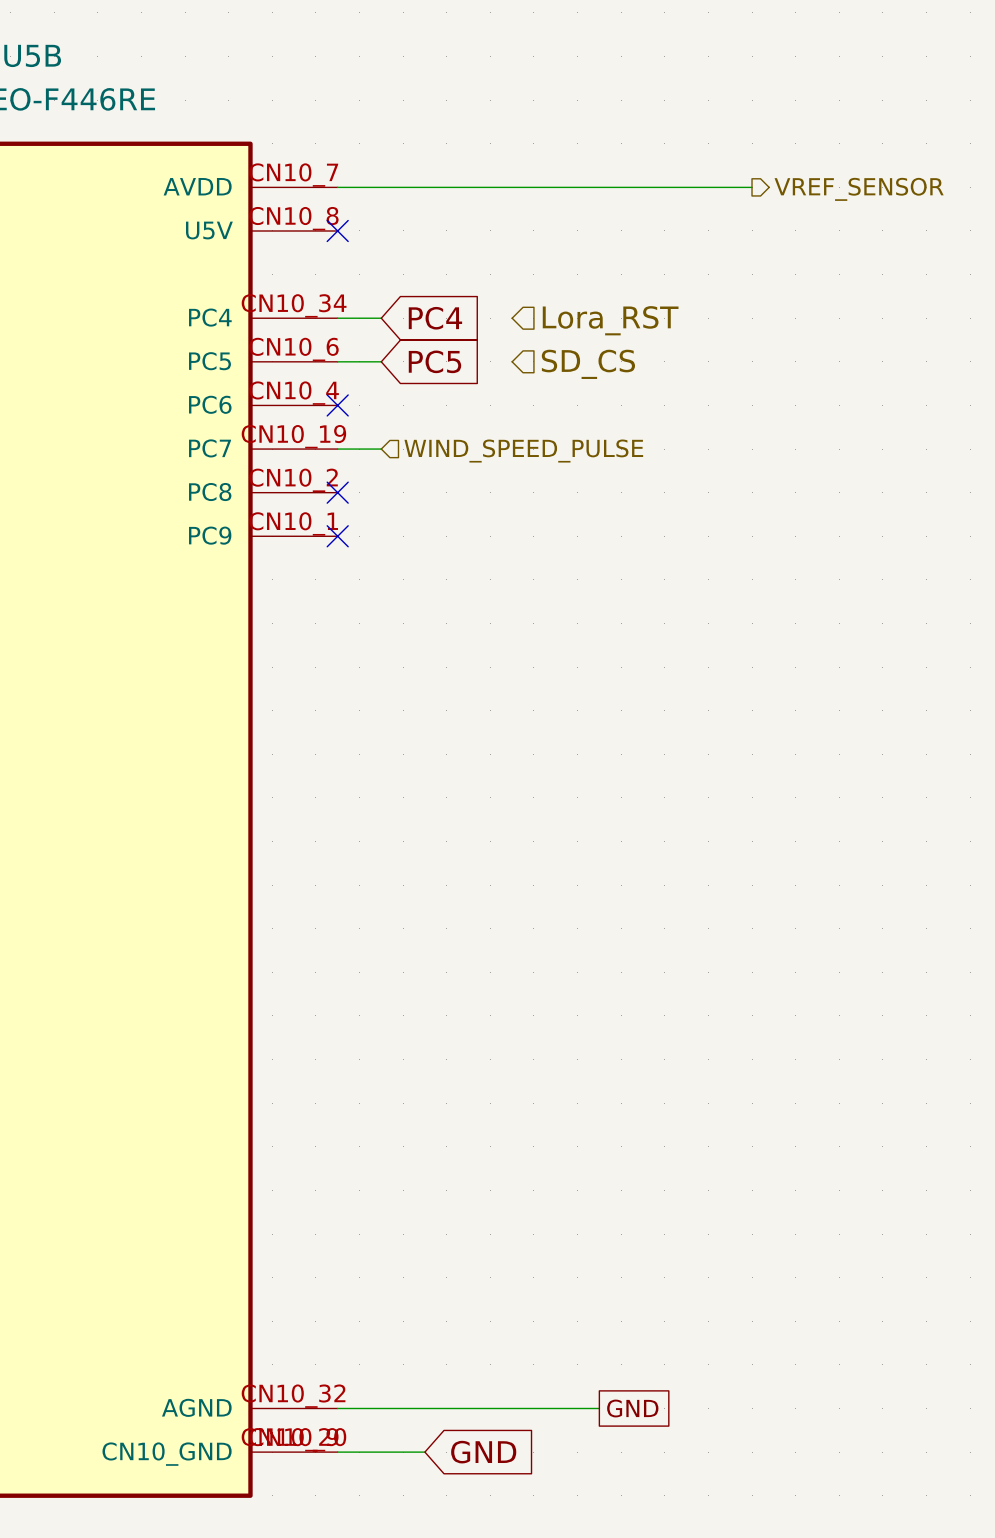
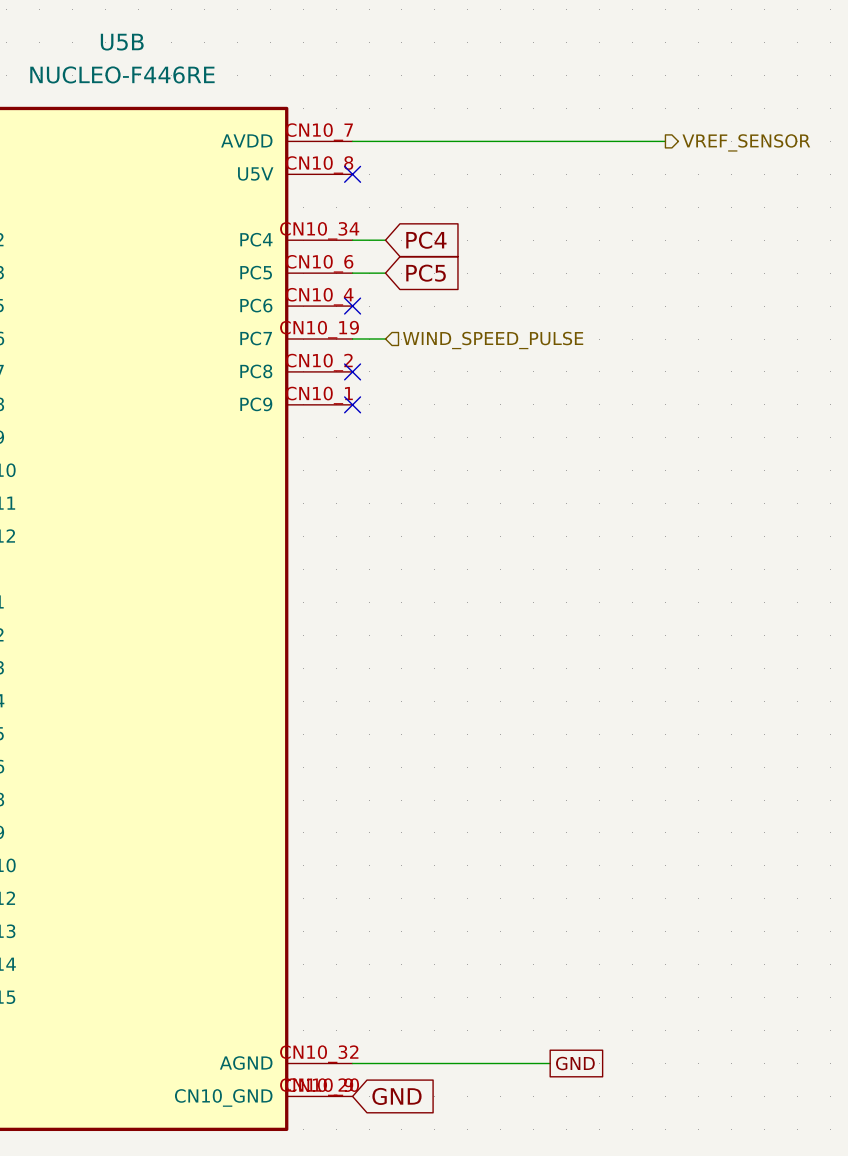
hierarchical label: Lora_RST (610, 320) -> none
hierarchical label: SD_CS (588, 364) -> none
wire: (337, 1452) (424, 1452) -> none
global label position: GND (483, 1452) -> GND (396, 1096)

